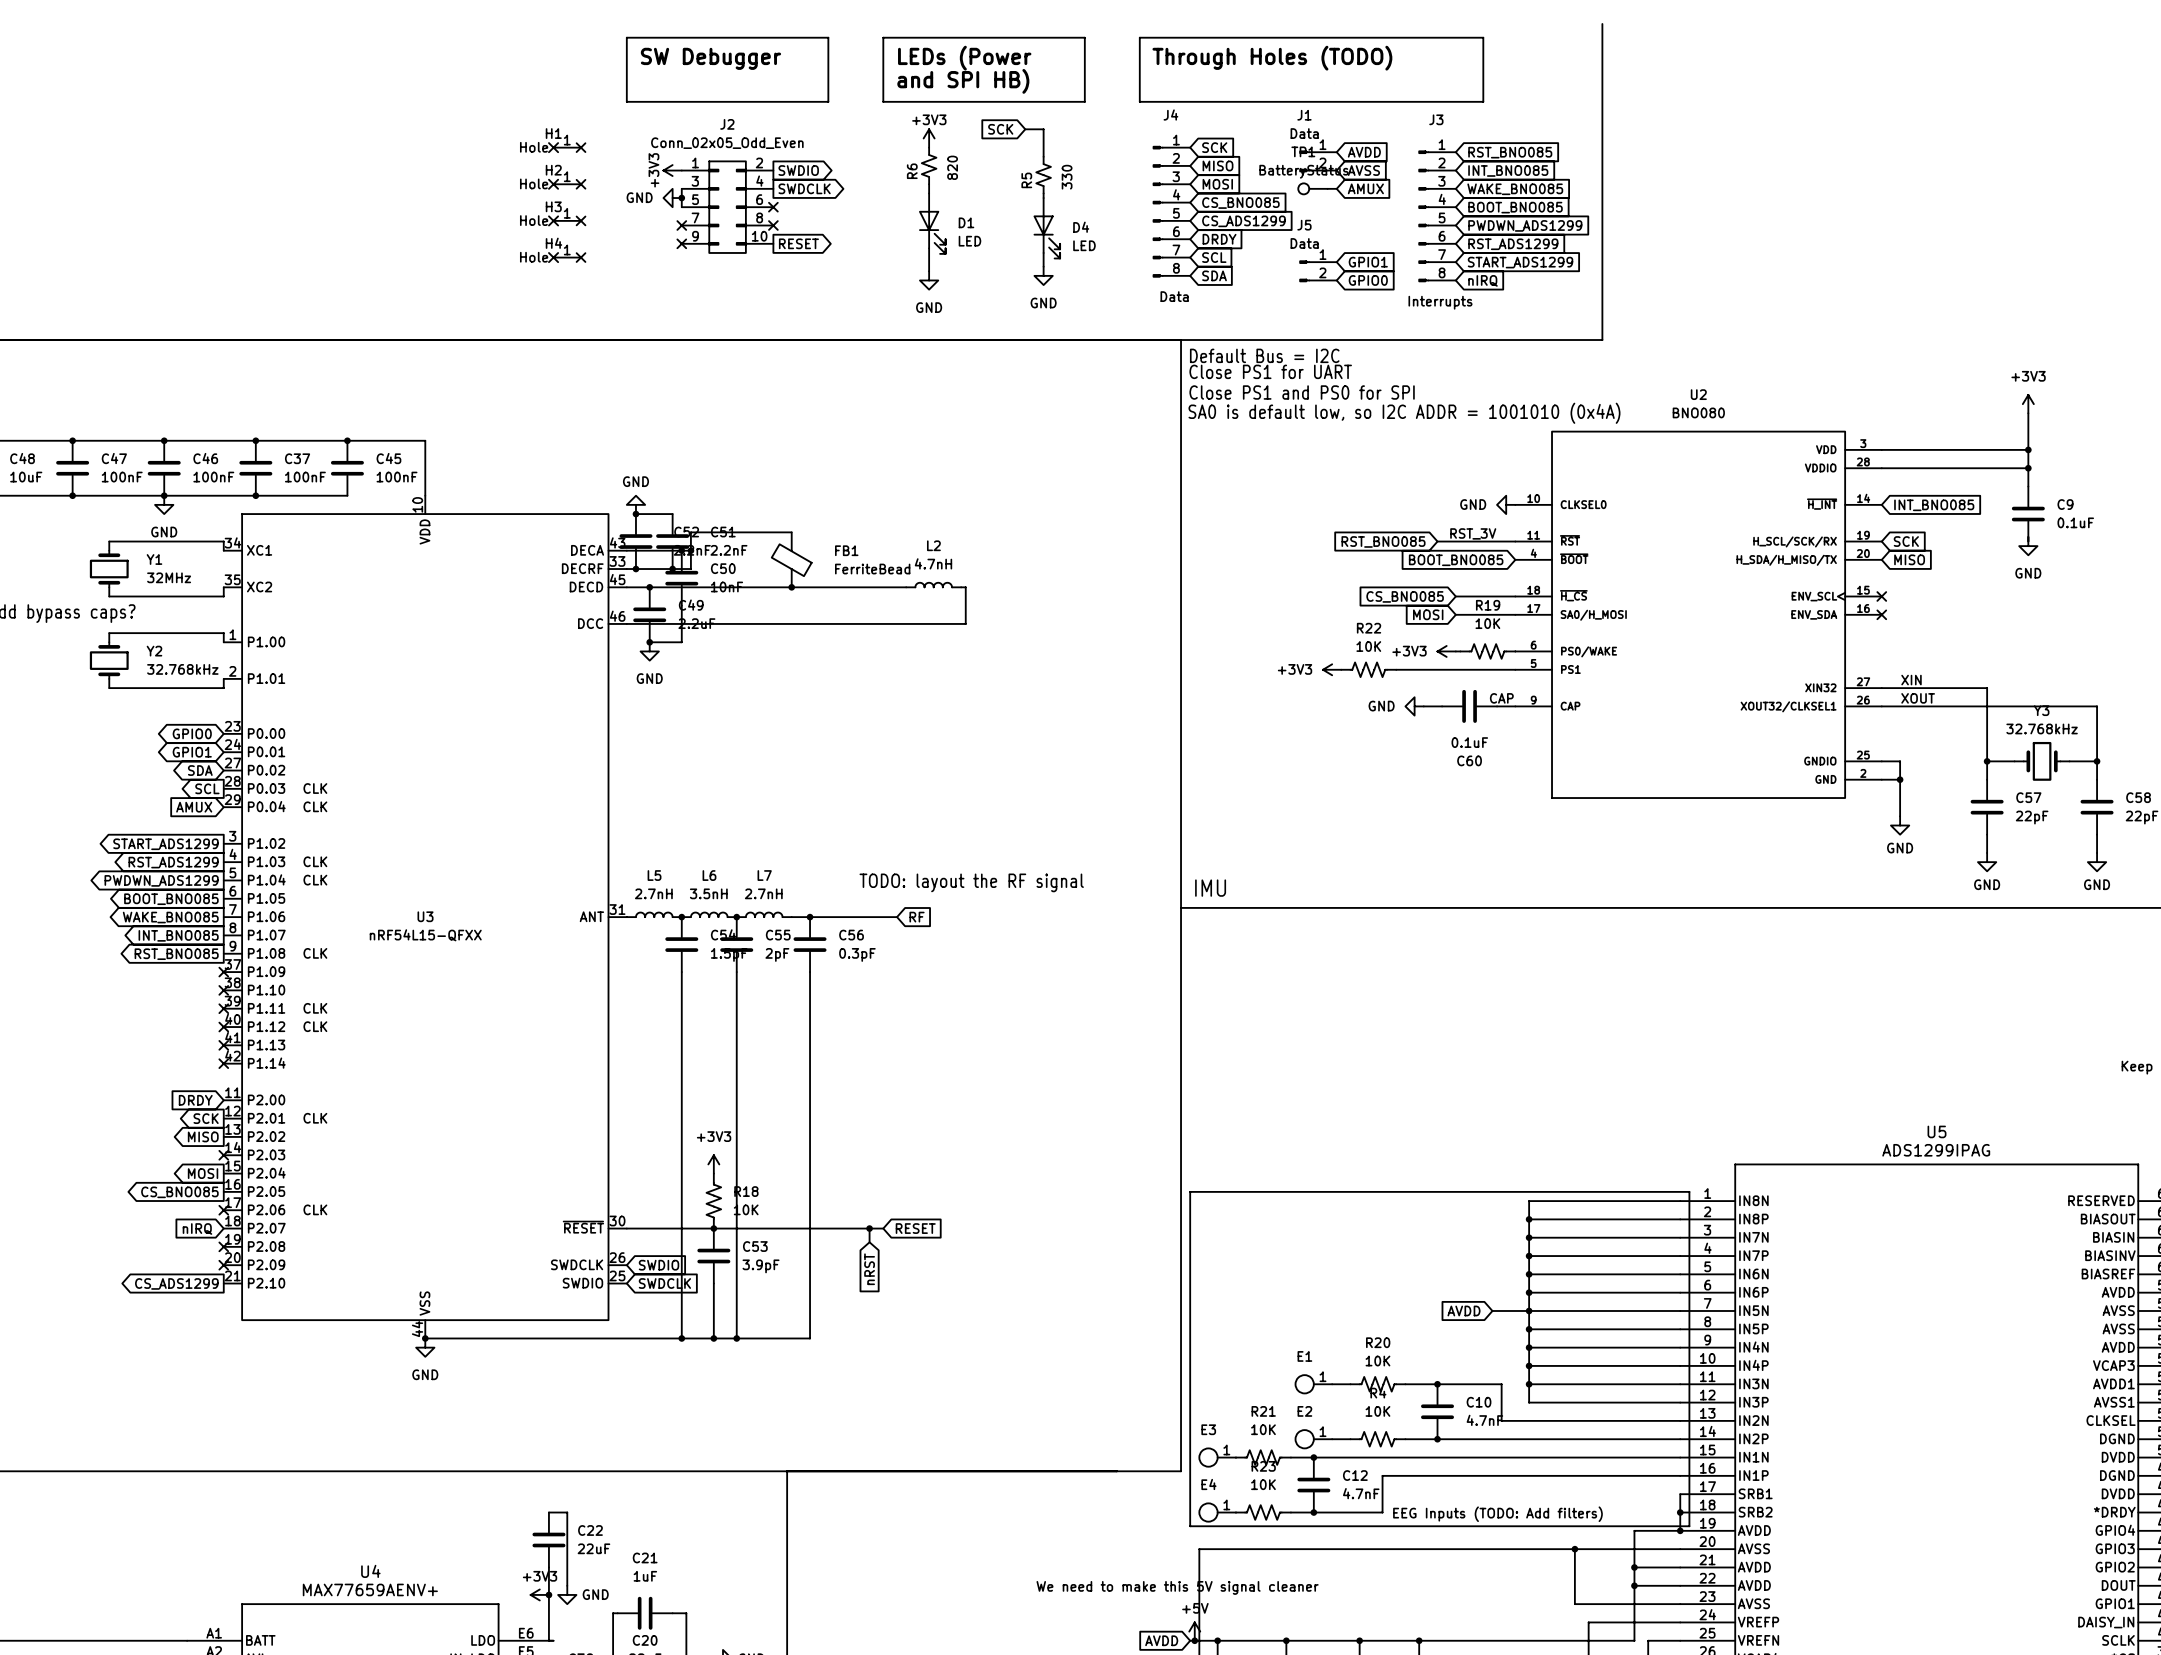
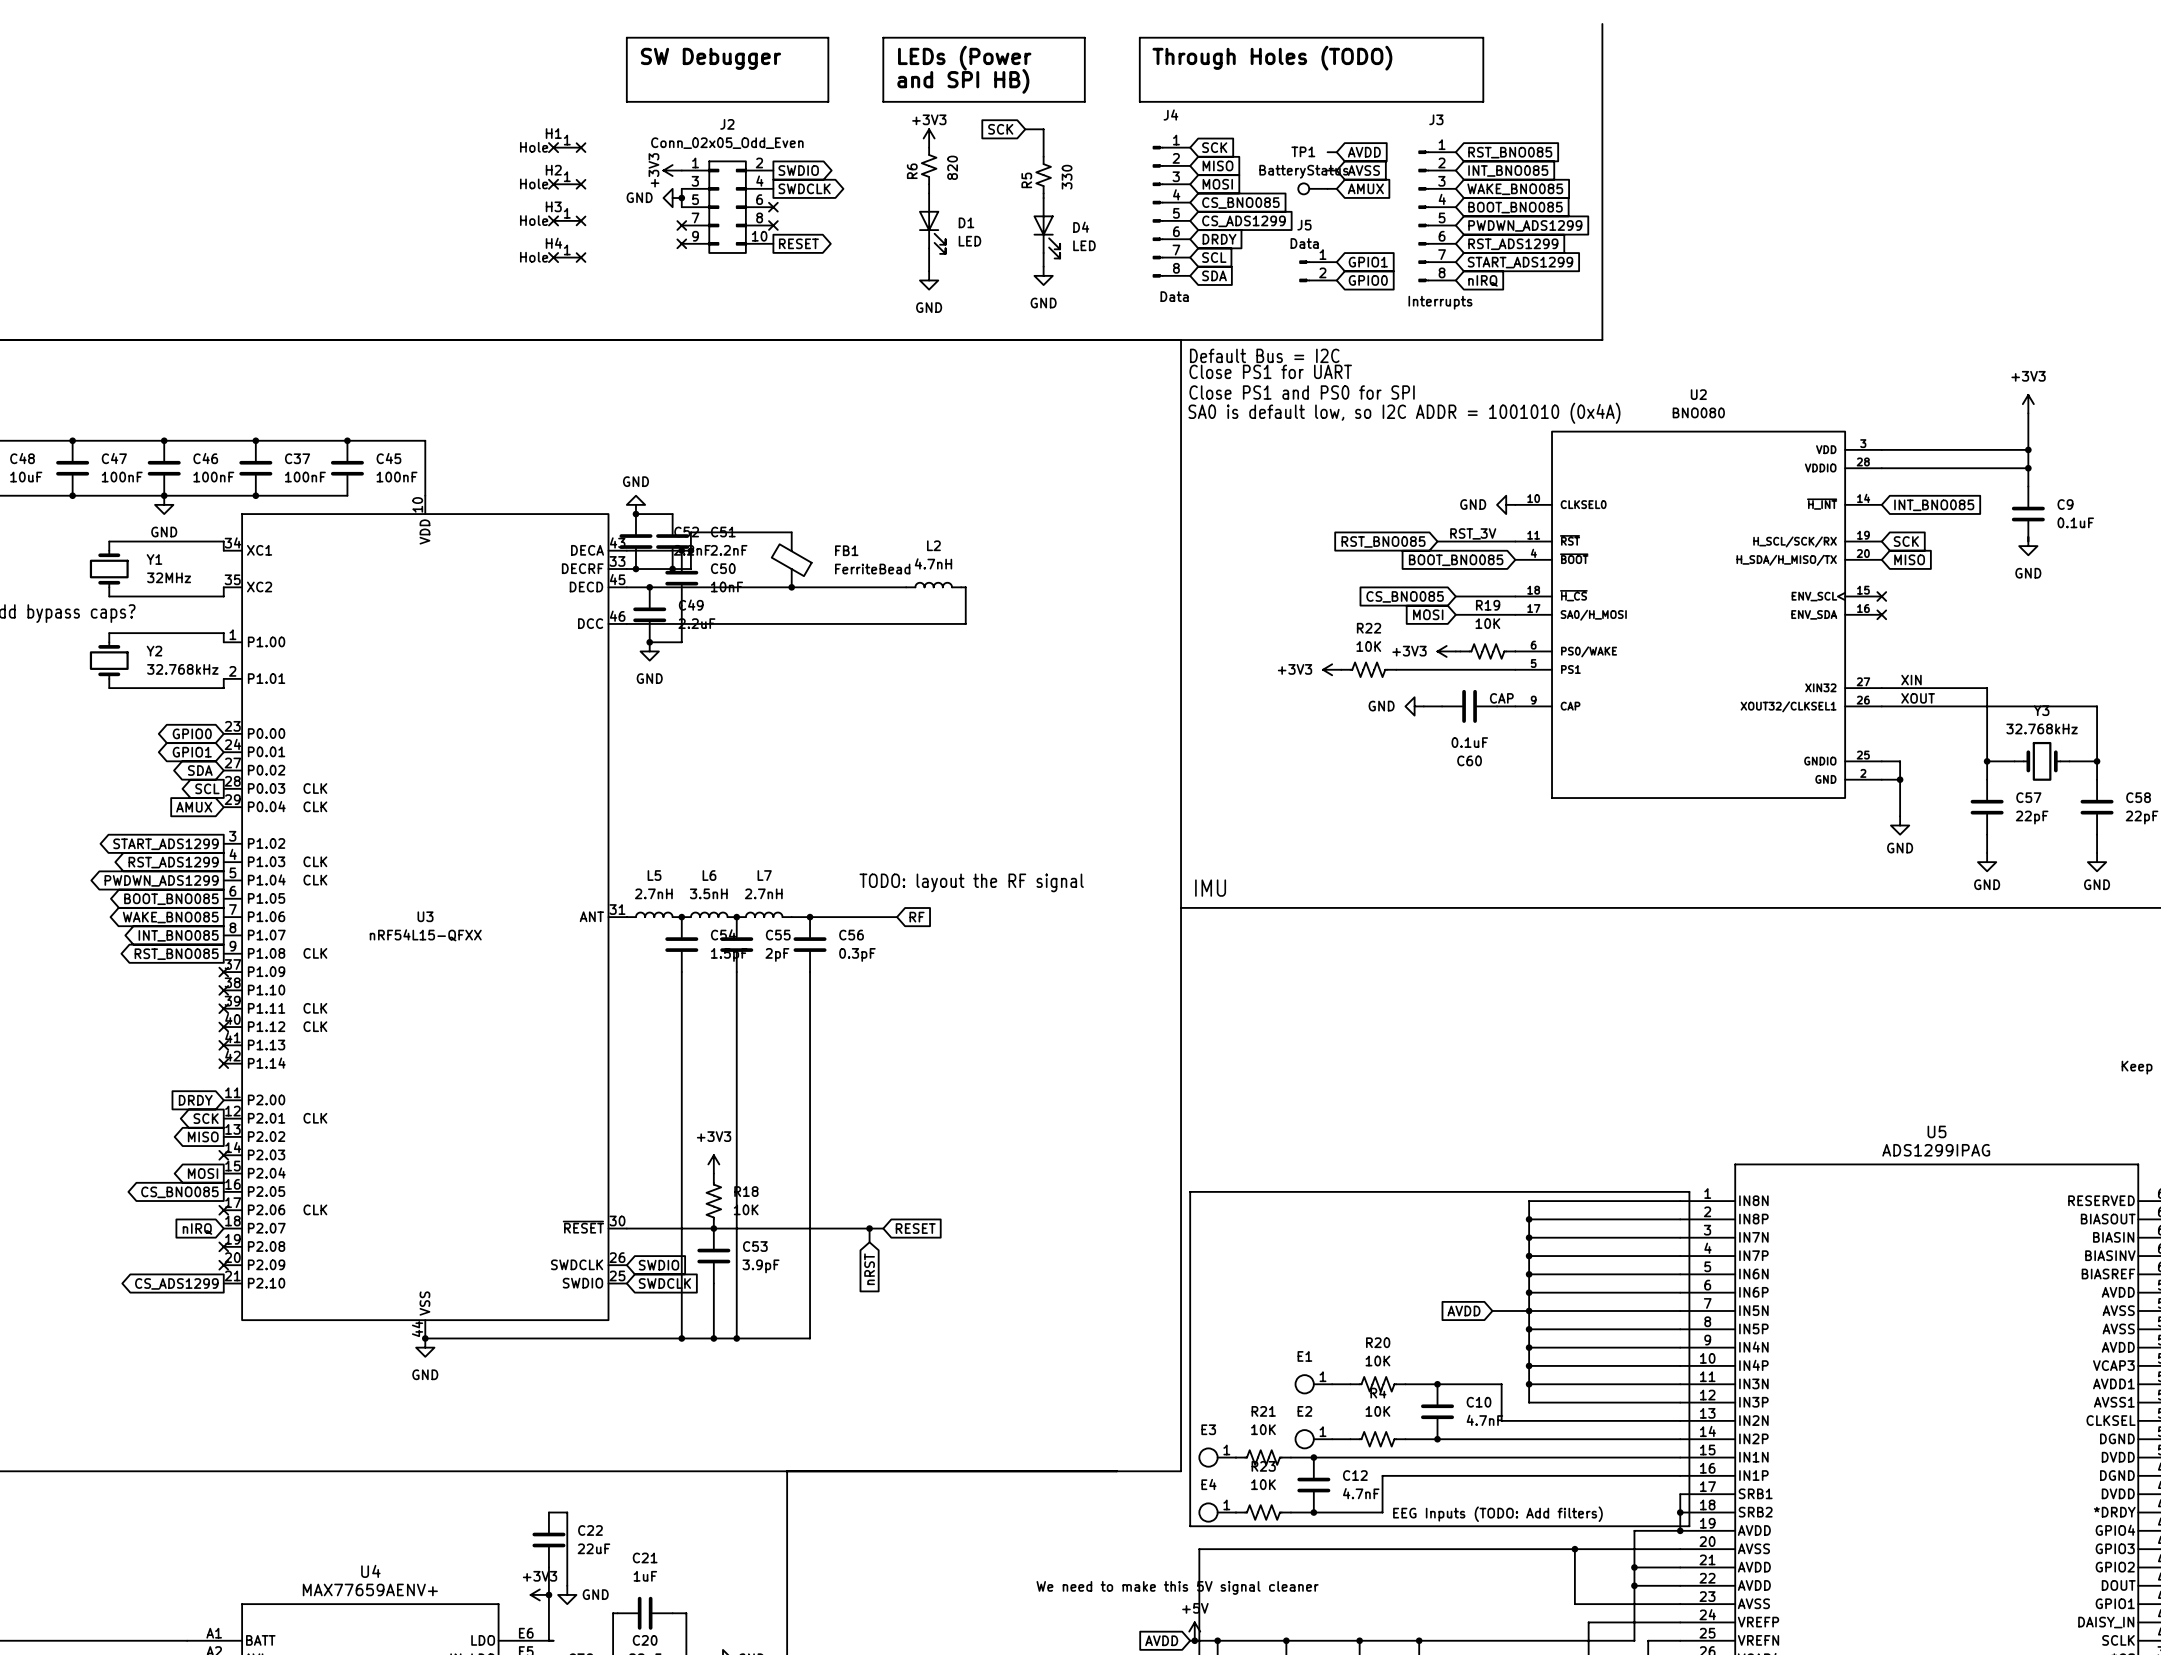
J1: Data (1318, 161) -> none

